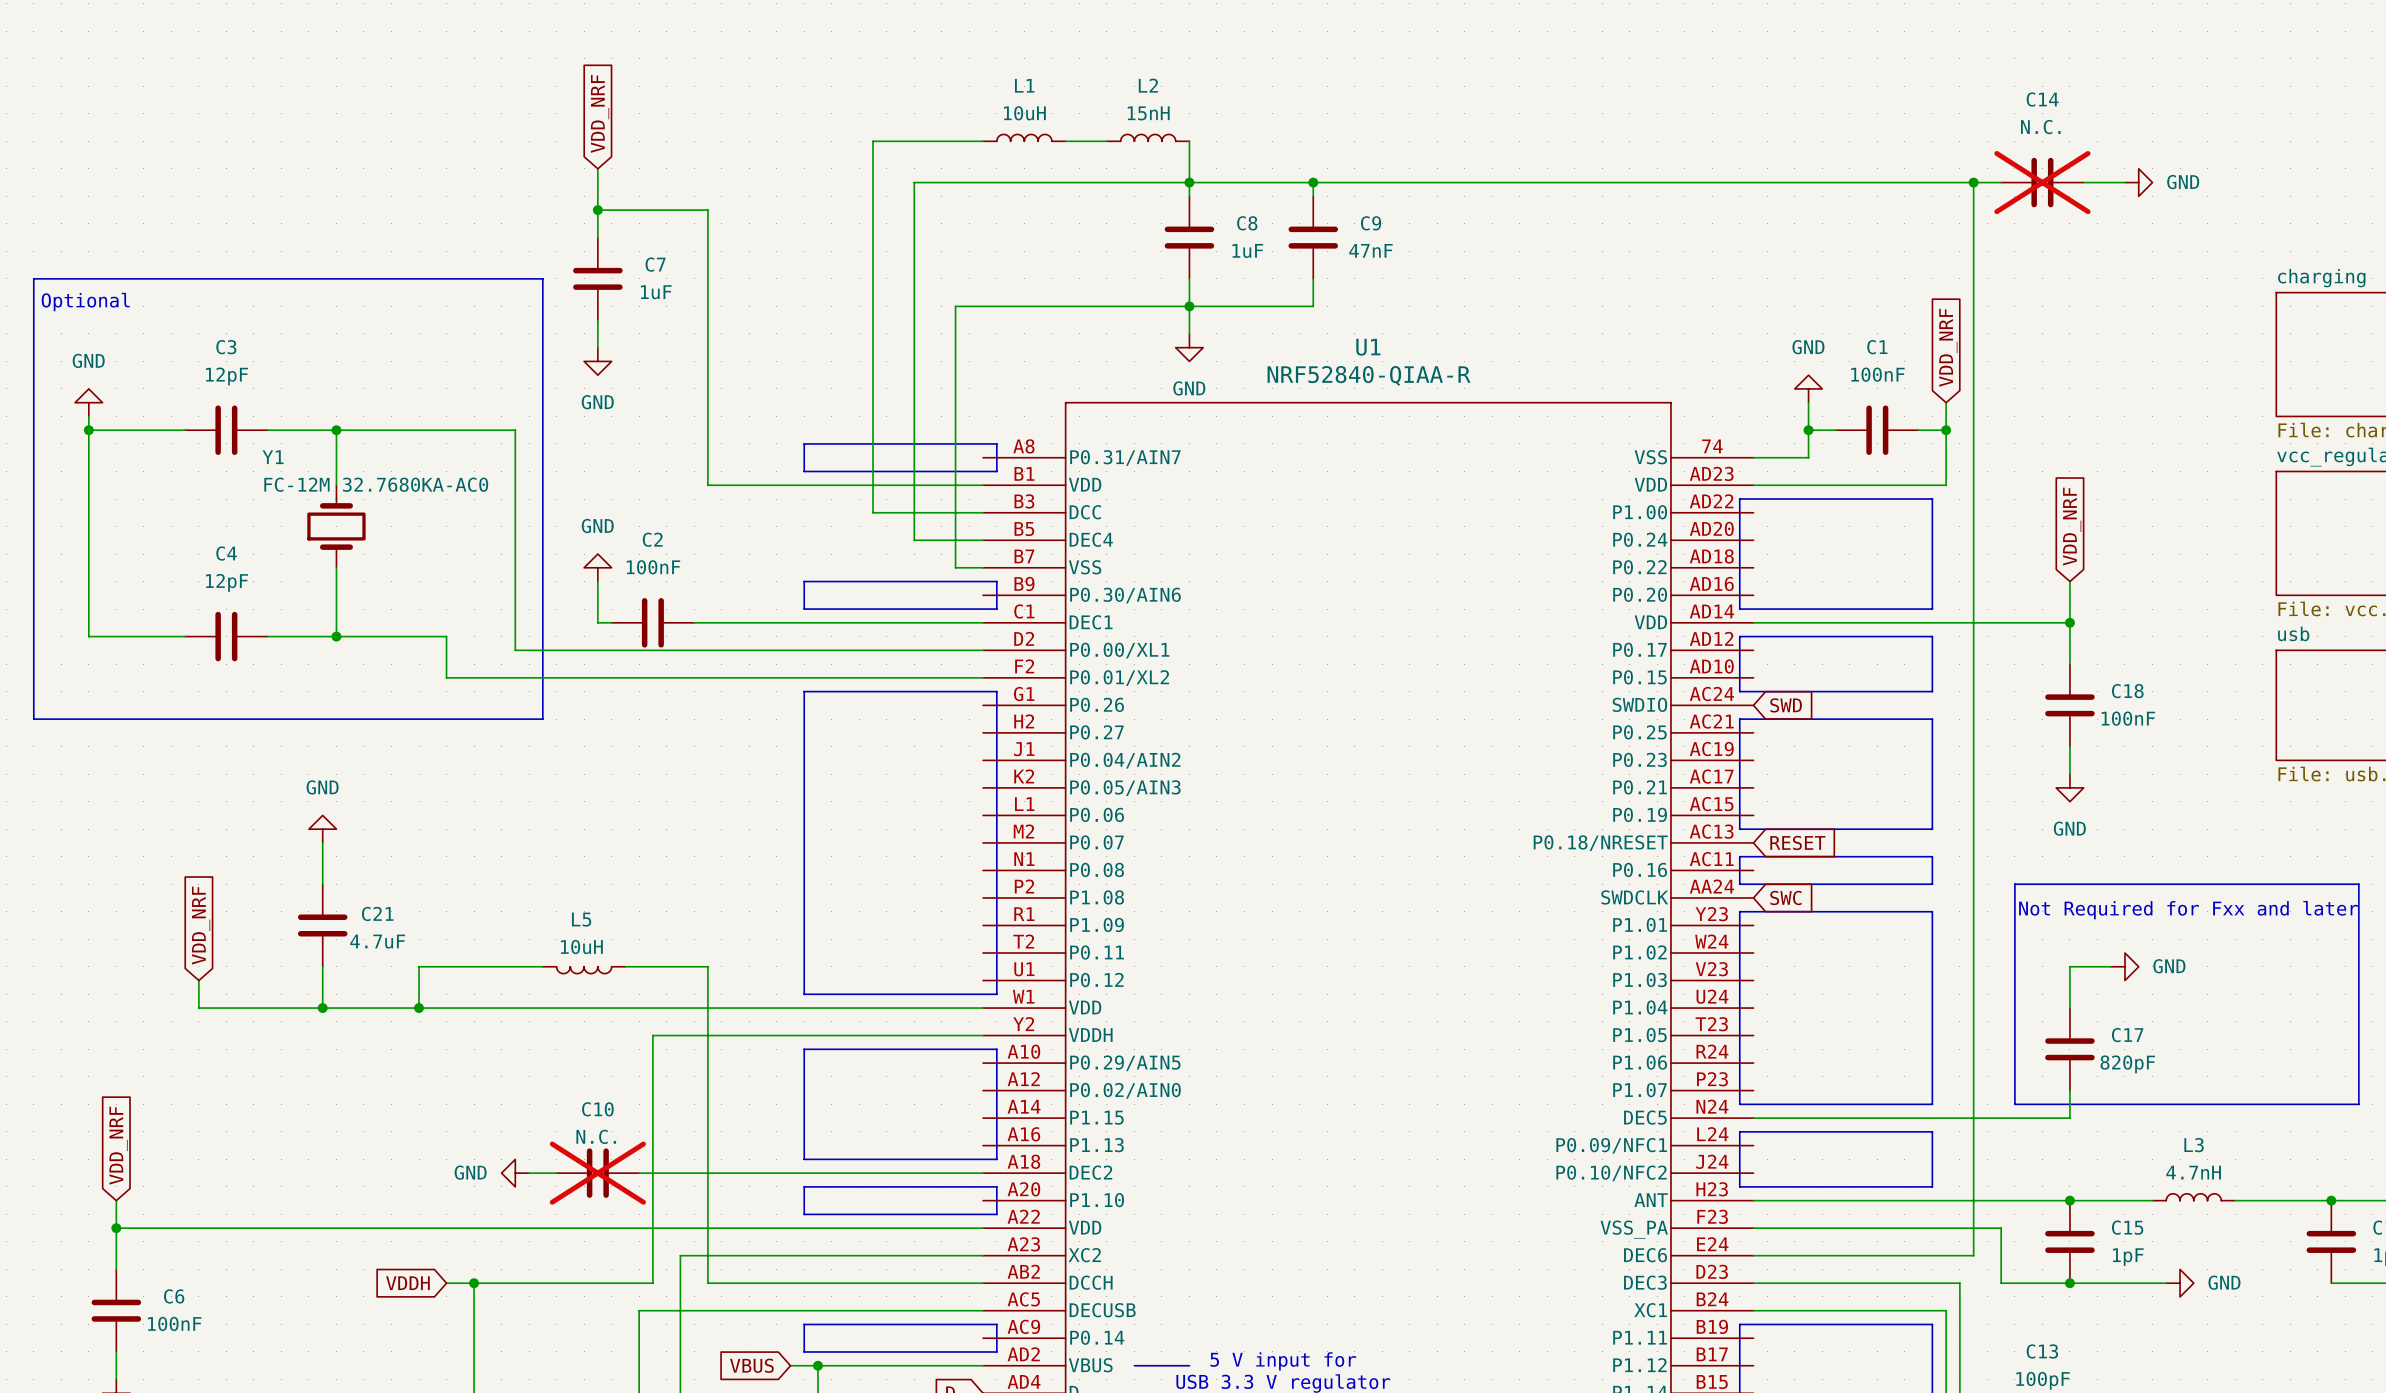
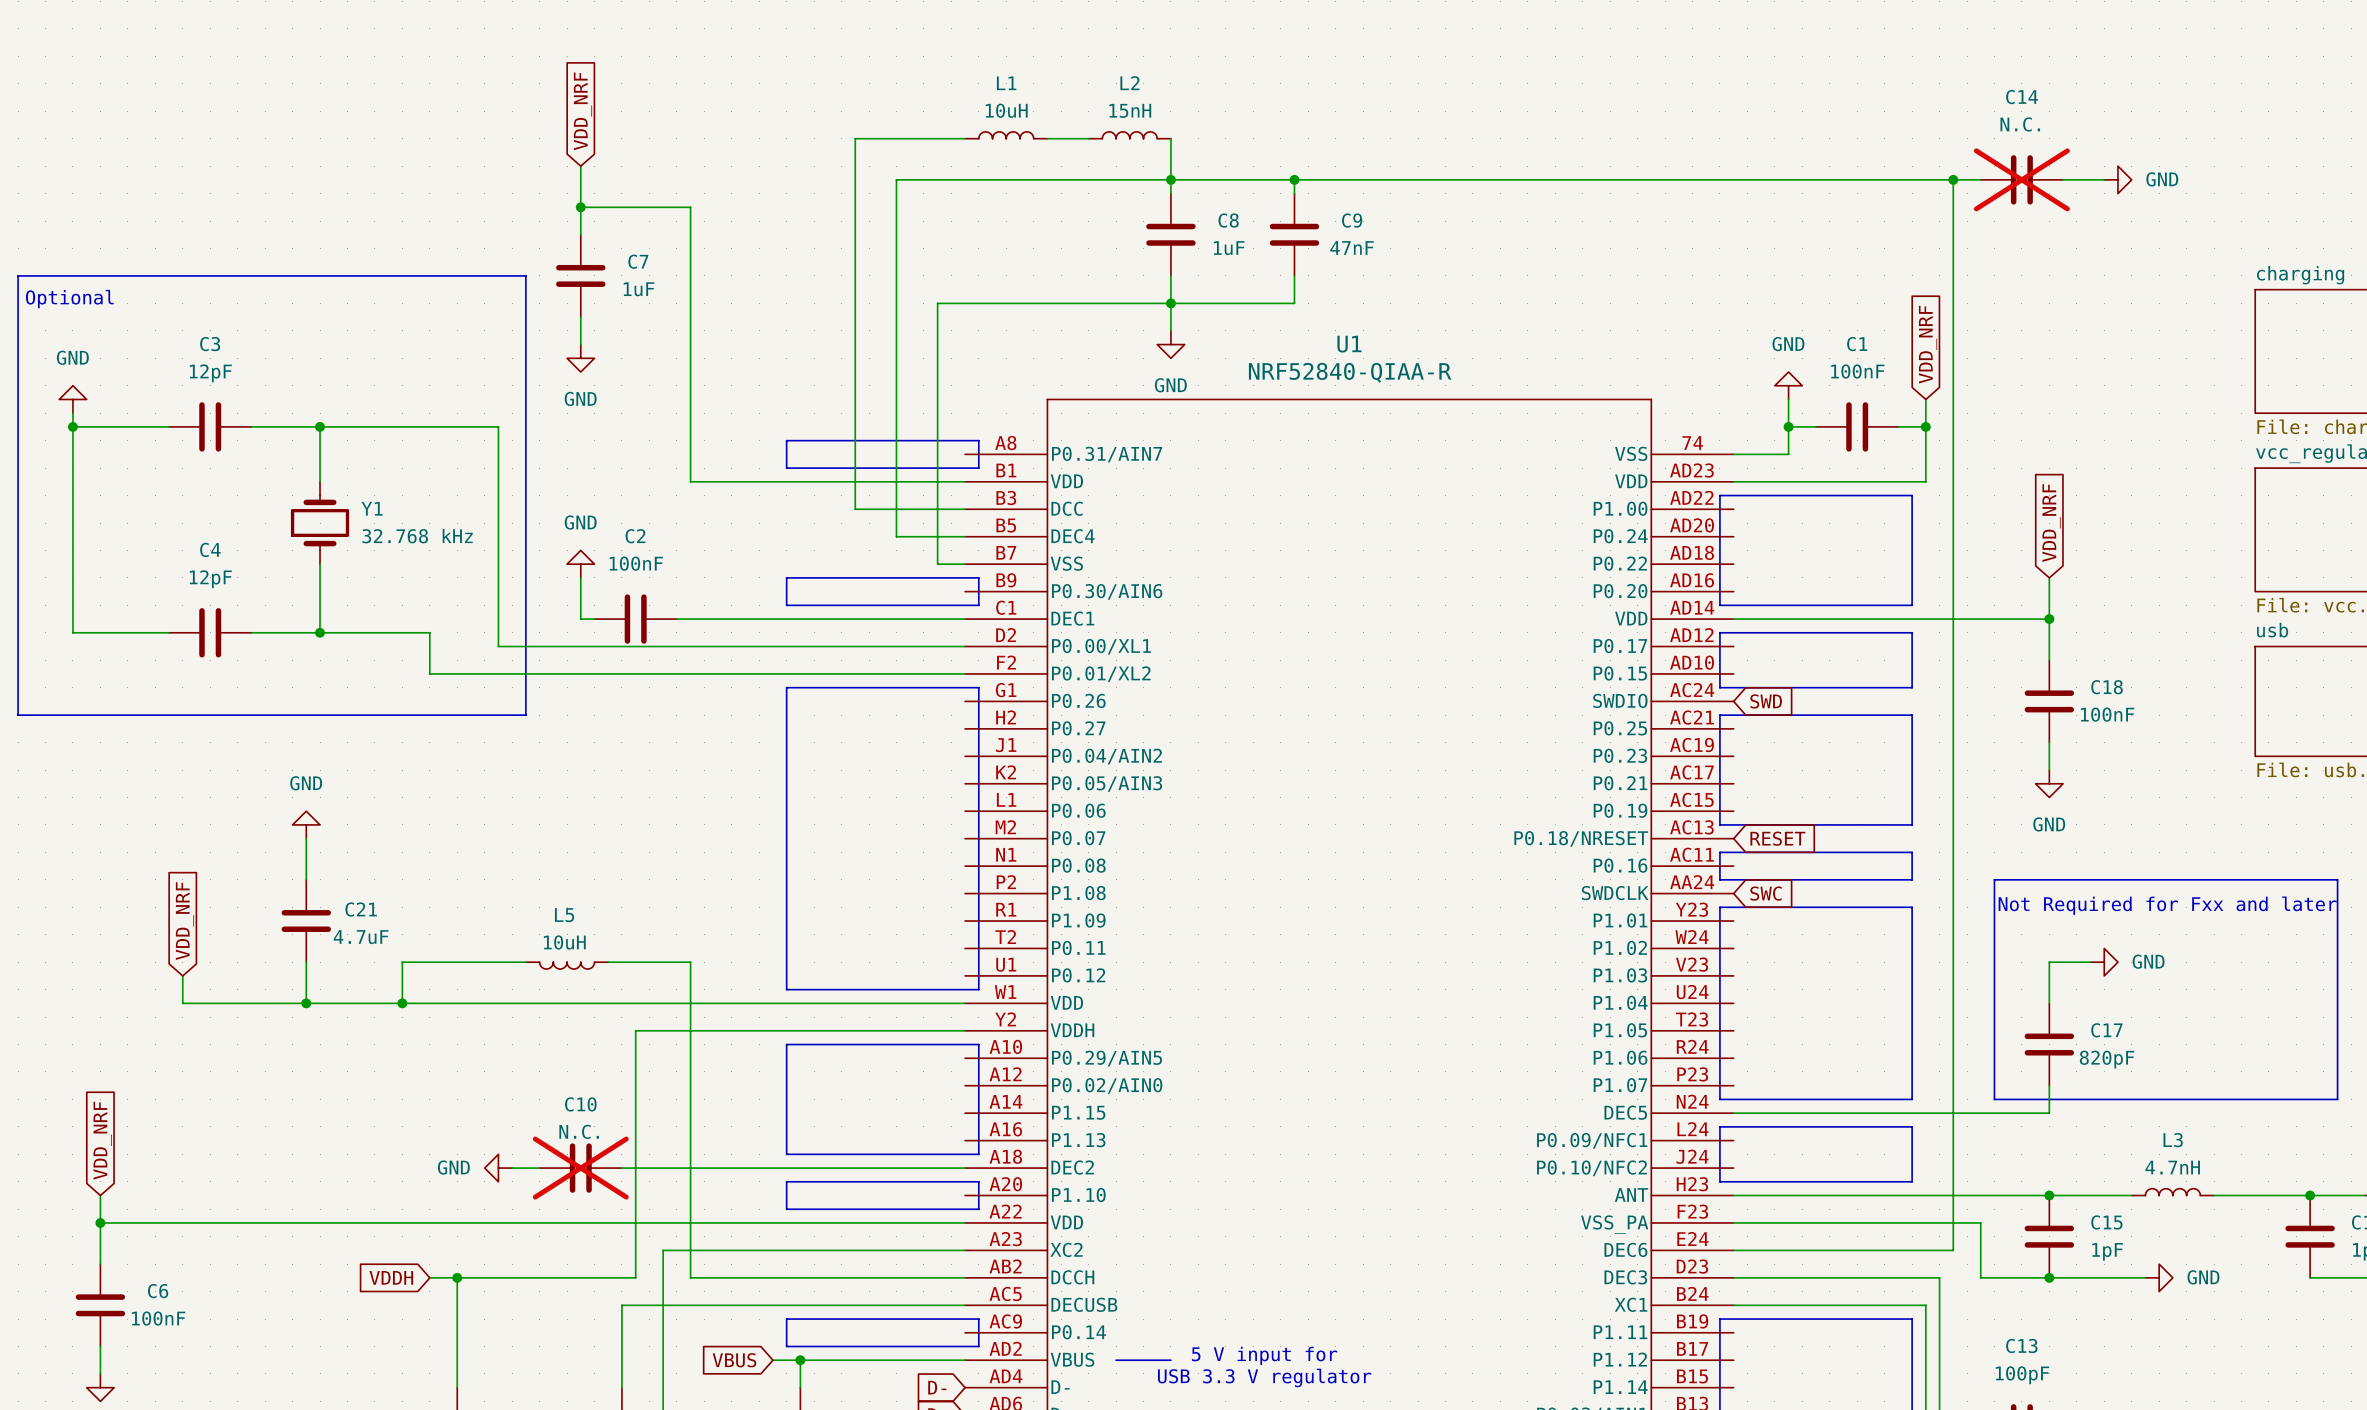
Y1 name position: Y1 (273, 457) -> Y1 (372, 508)
Y1 value: FC-12M 32.7680KA-AC0 (376, 484) -> 32.768 kHz (417, 536)

